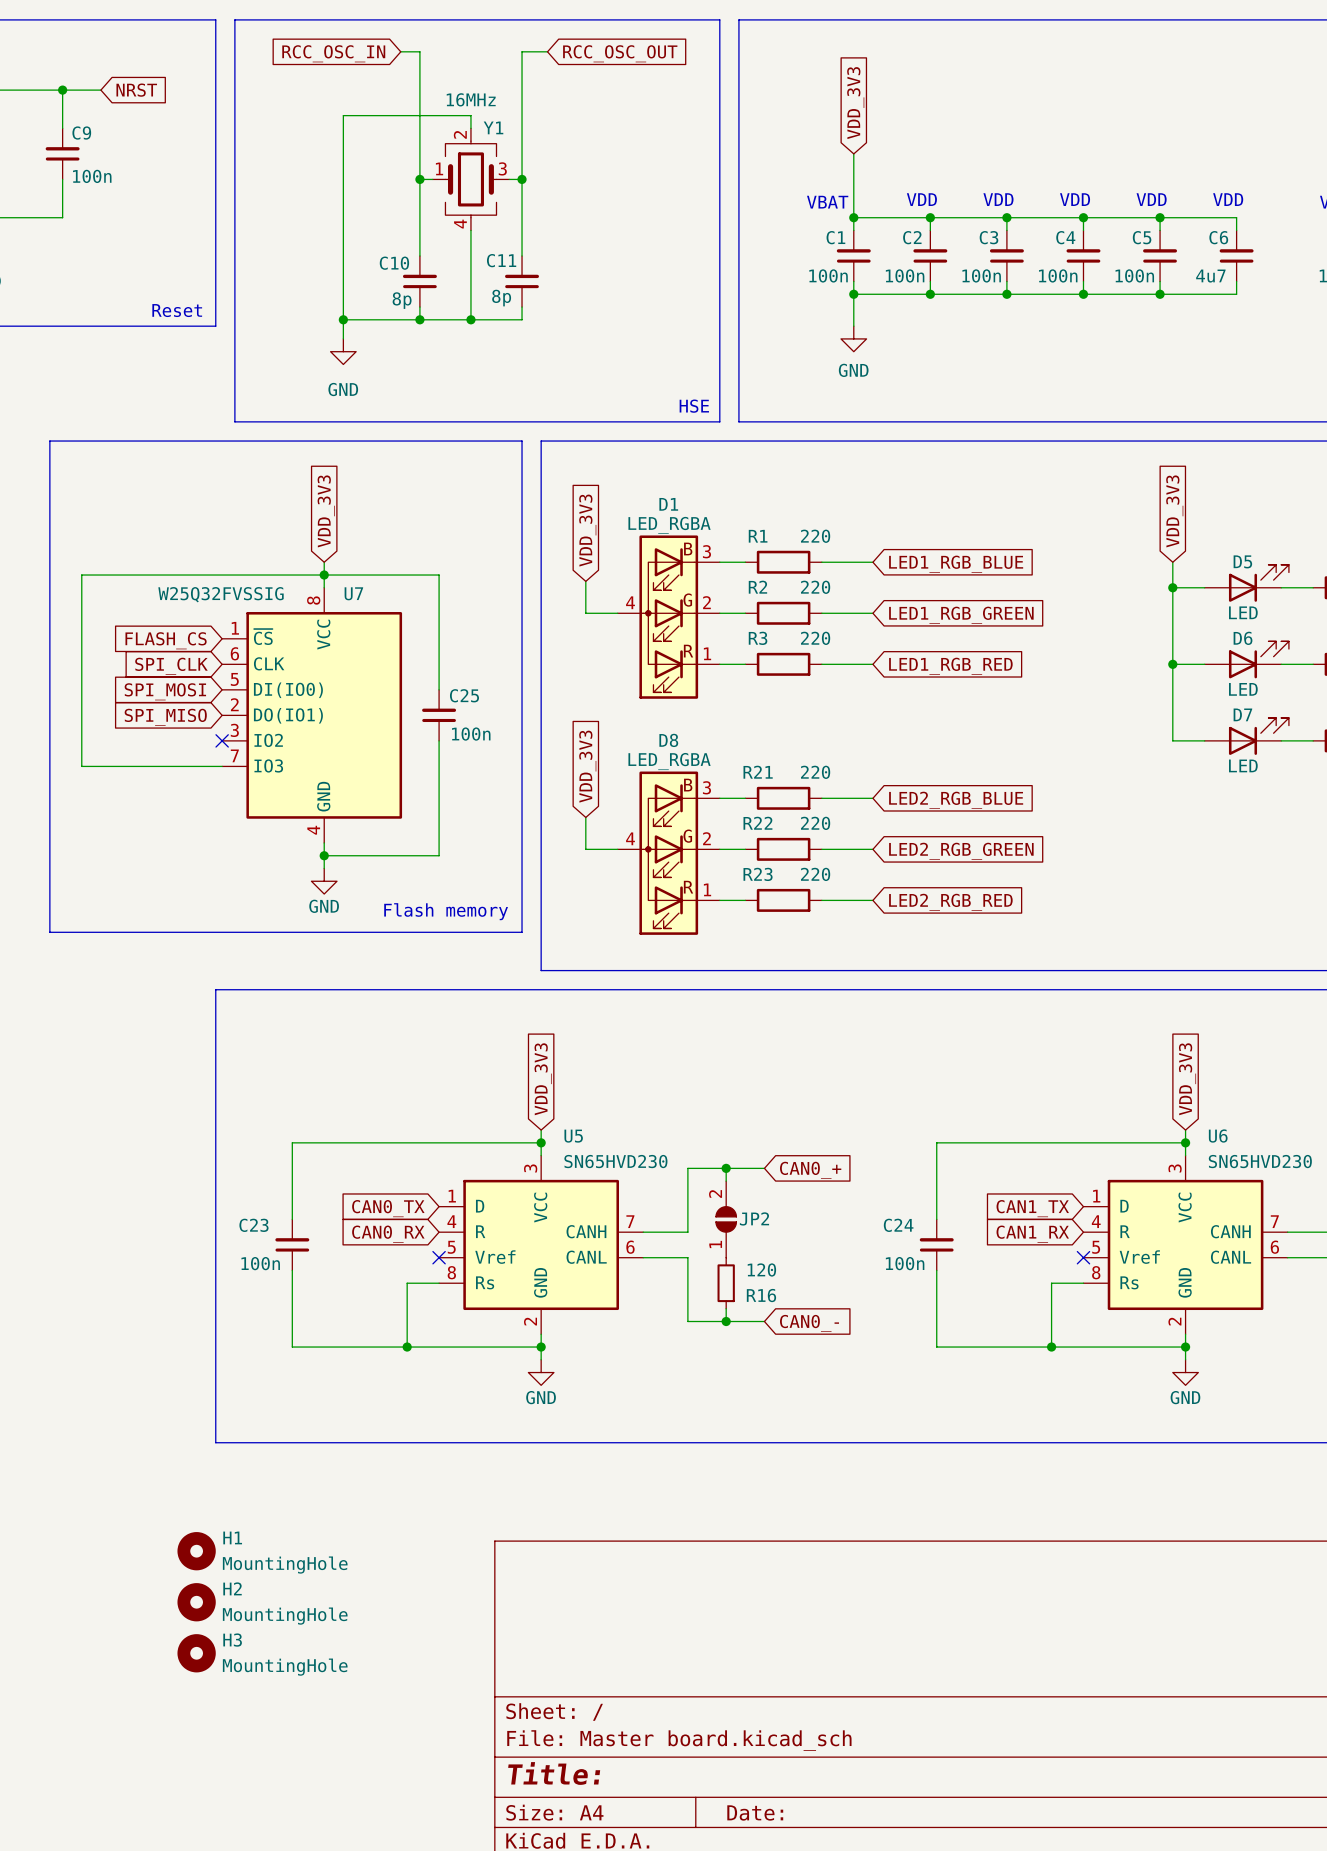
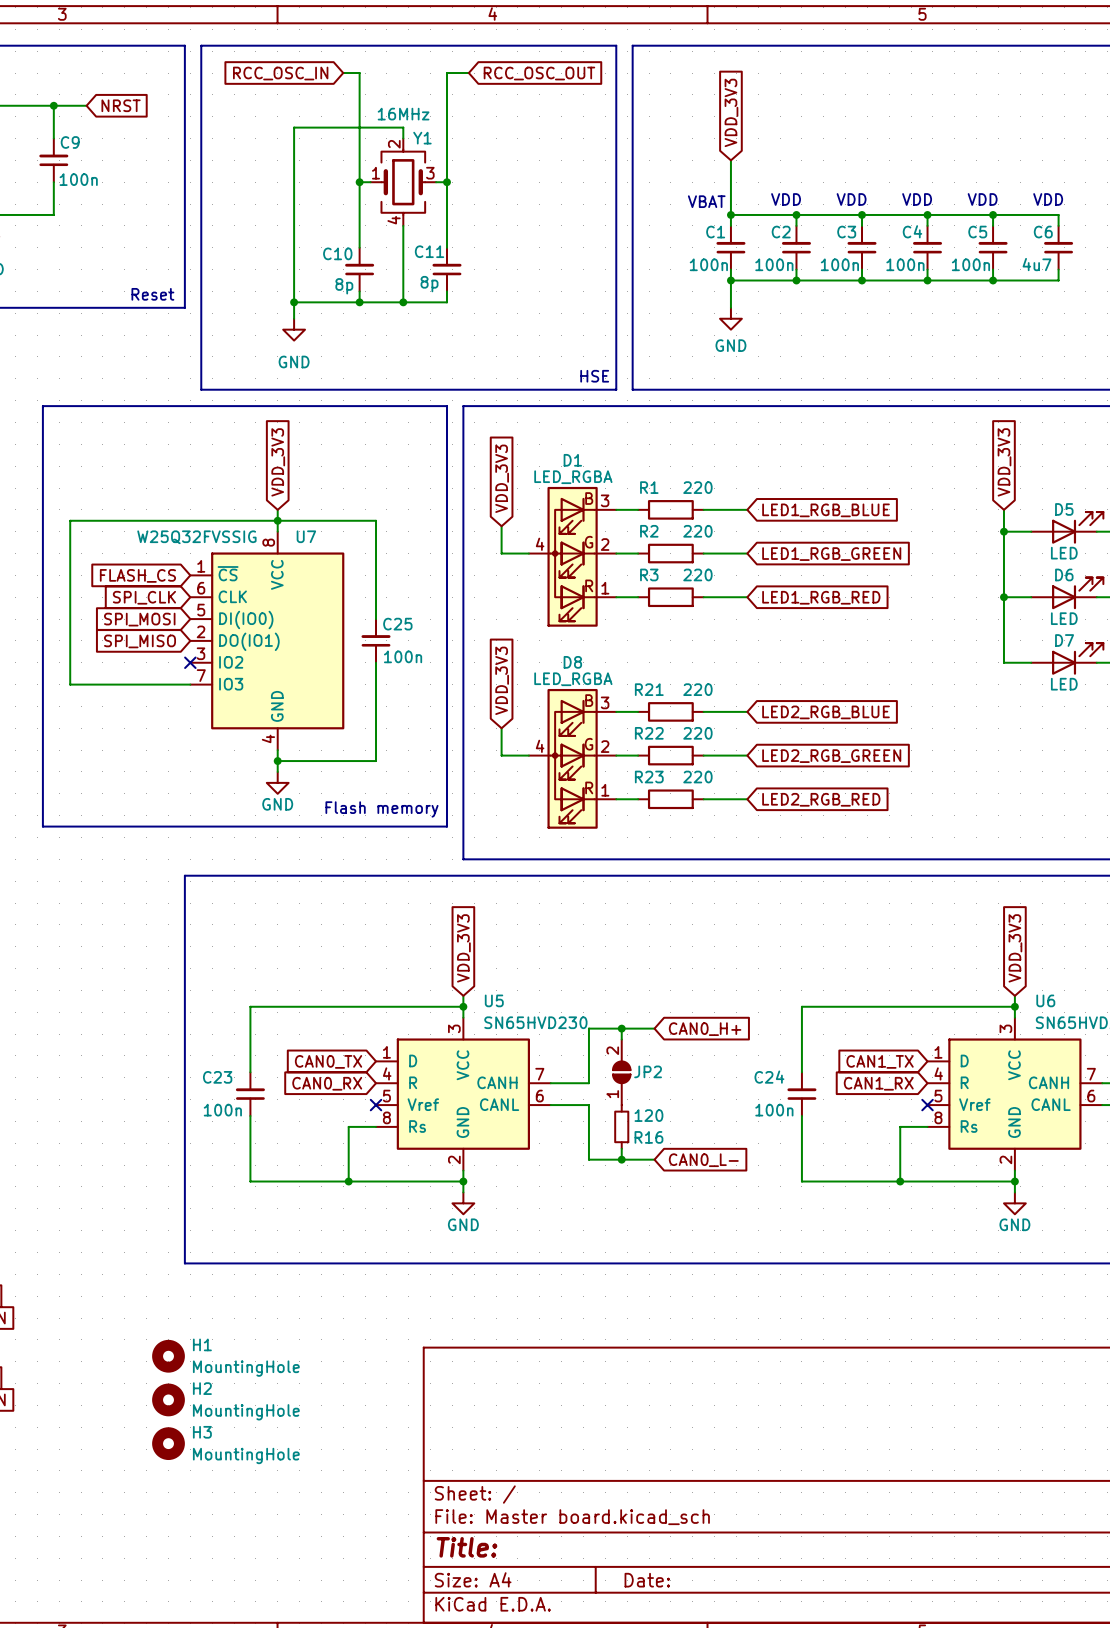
global label: CAN0_+ (810, 1170) -> CAN0_H+ (705, 1029)
global label: CAN0_- (809, 1323) -> CAN0_L- (703, 1160)

